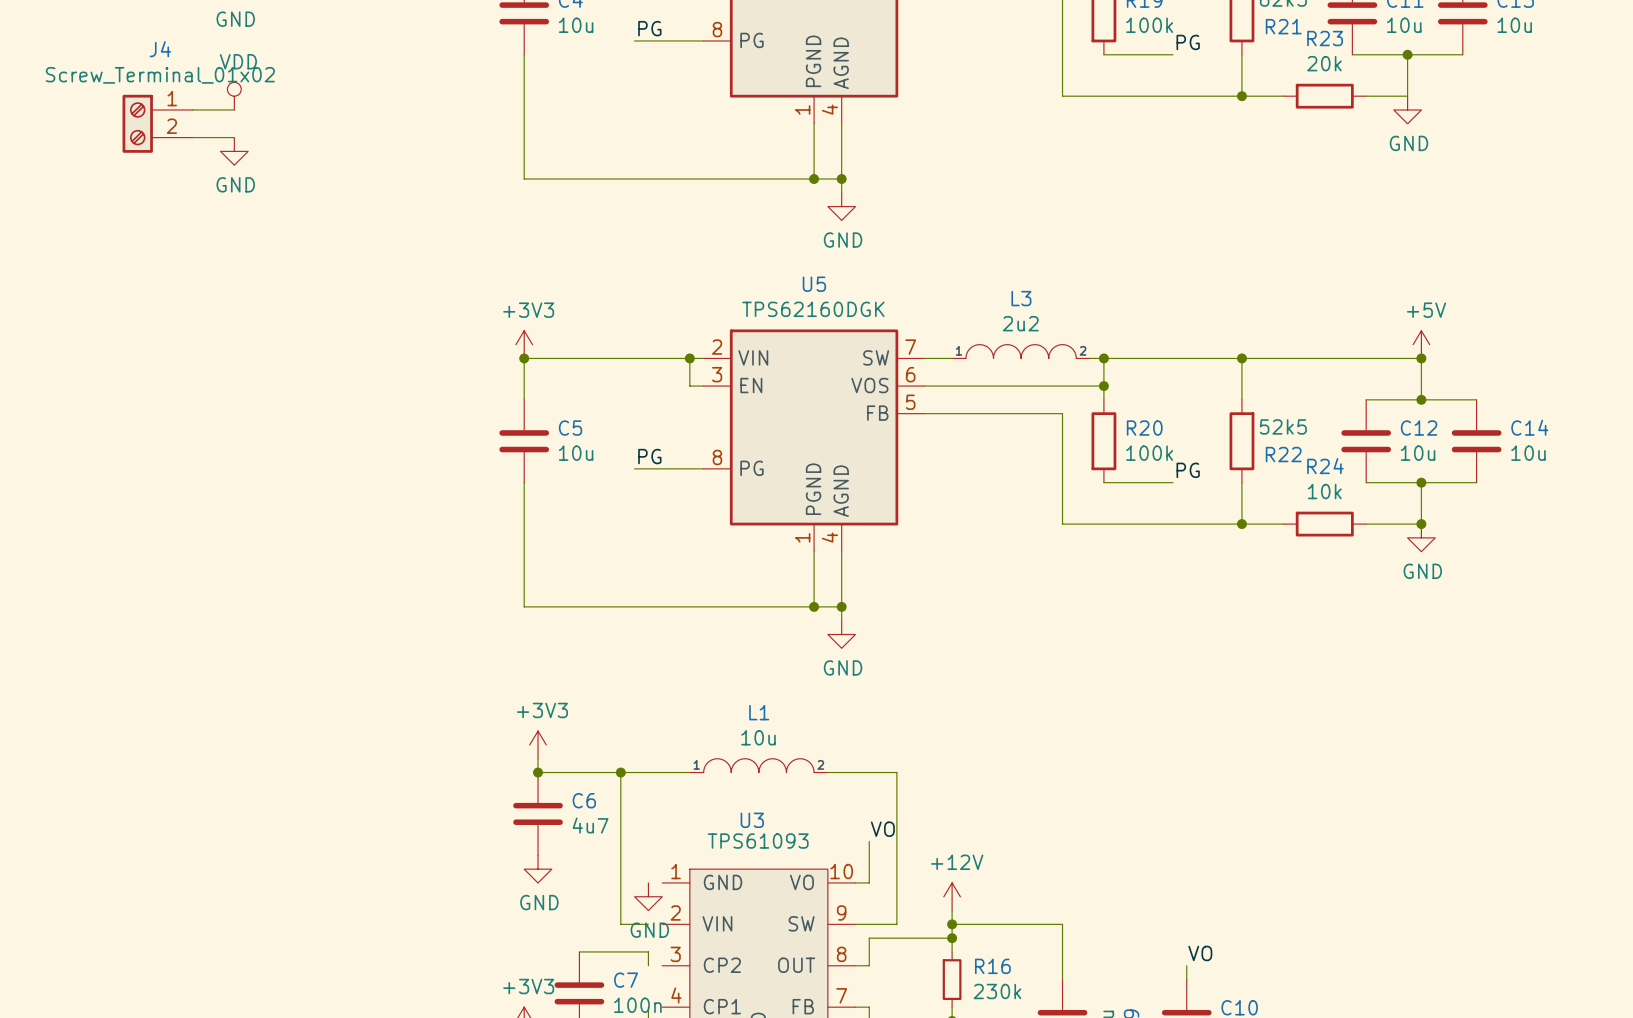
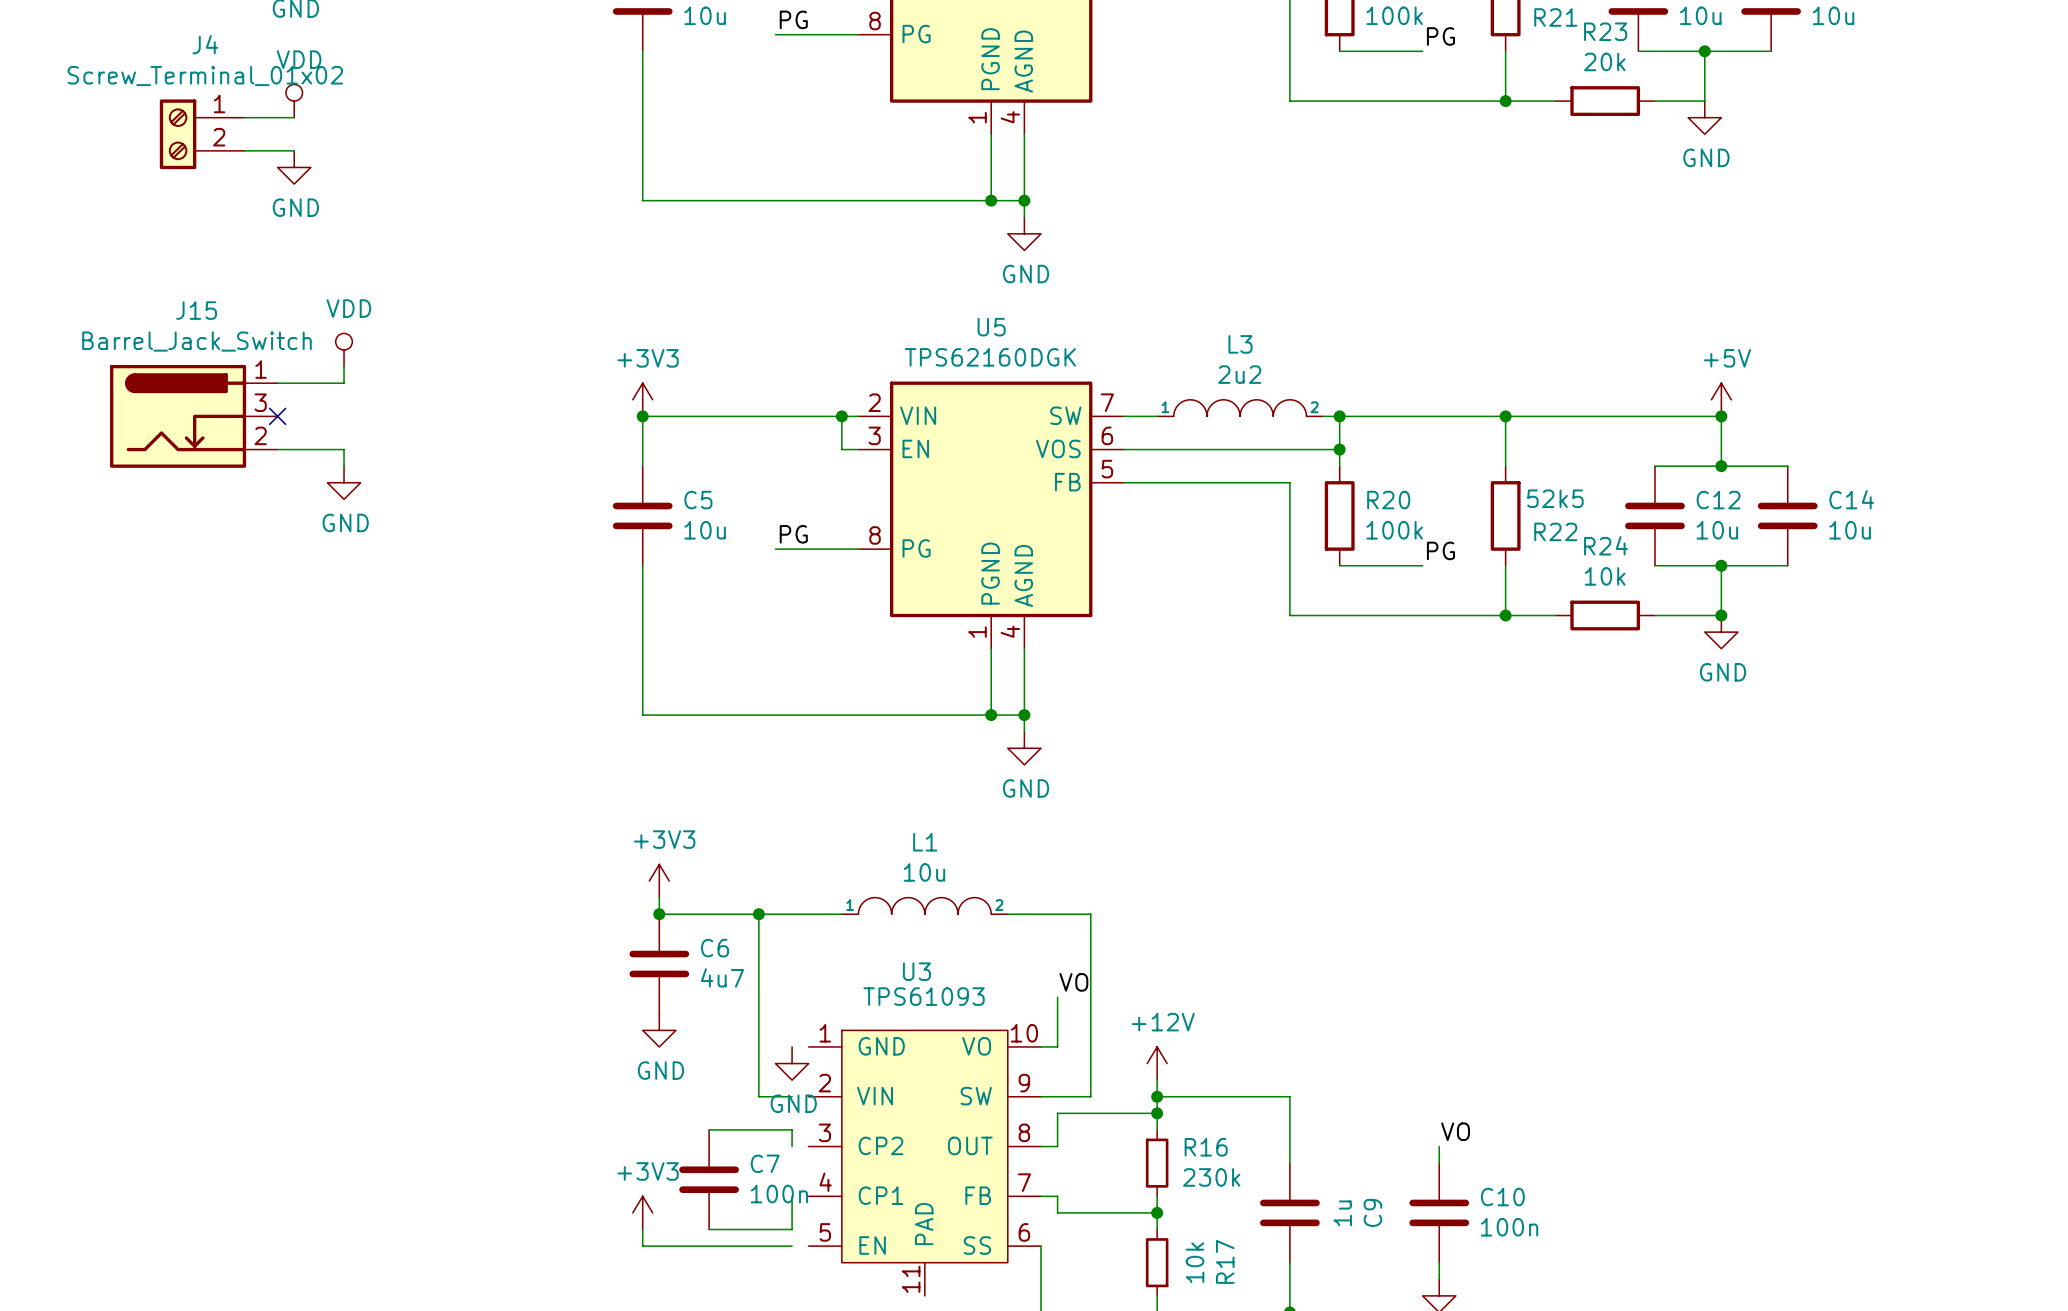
power symbol: none -> VDD (344, 350)
wire: none -> (344, 366) (344, 383) (277, 383)
J15: none -> Barrel_Jack_Switch (193, 416)
no-connect mark: none -> (277, 416)
wire: none -> (277, 449) (344, 449) (344, 466)
power symbol: none -> GND (344, 482)

